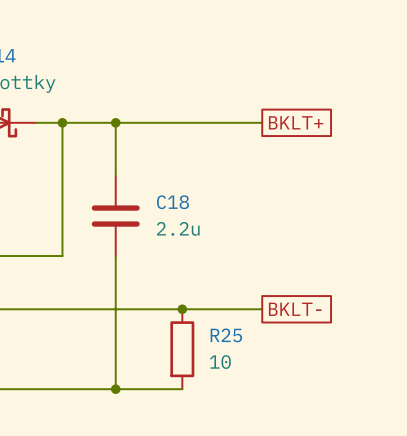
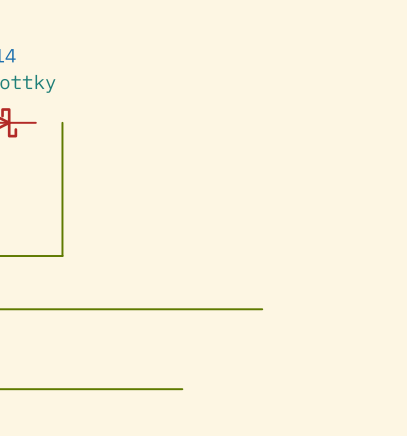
wire: (35, 122) (262, 122) -> none
junction: (62, 122) -> none
wire: (115, 122) (115, 176) -> none
junction: (115, 122) -> none
global label: BKLT+ (296, 122) -> none
C18: 2.2u (115, 216) -> none
wire: (115, 256) (115, 389) -> none
junction: (182, 309) -> none
global label: BKLT- (295, 309) -> none
R25: 10 (182, 349) -> none
junction: (115, 389) -> none

